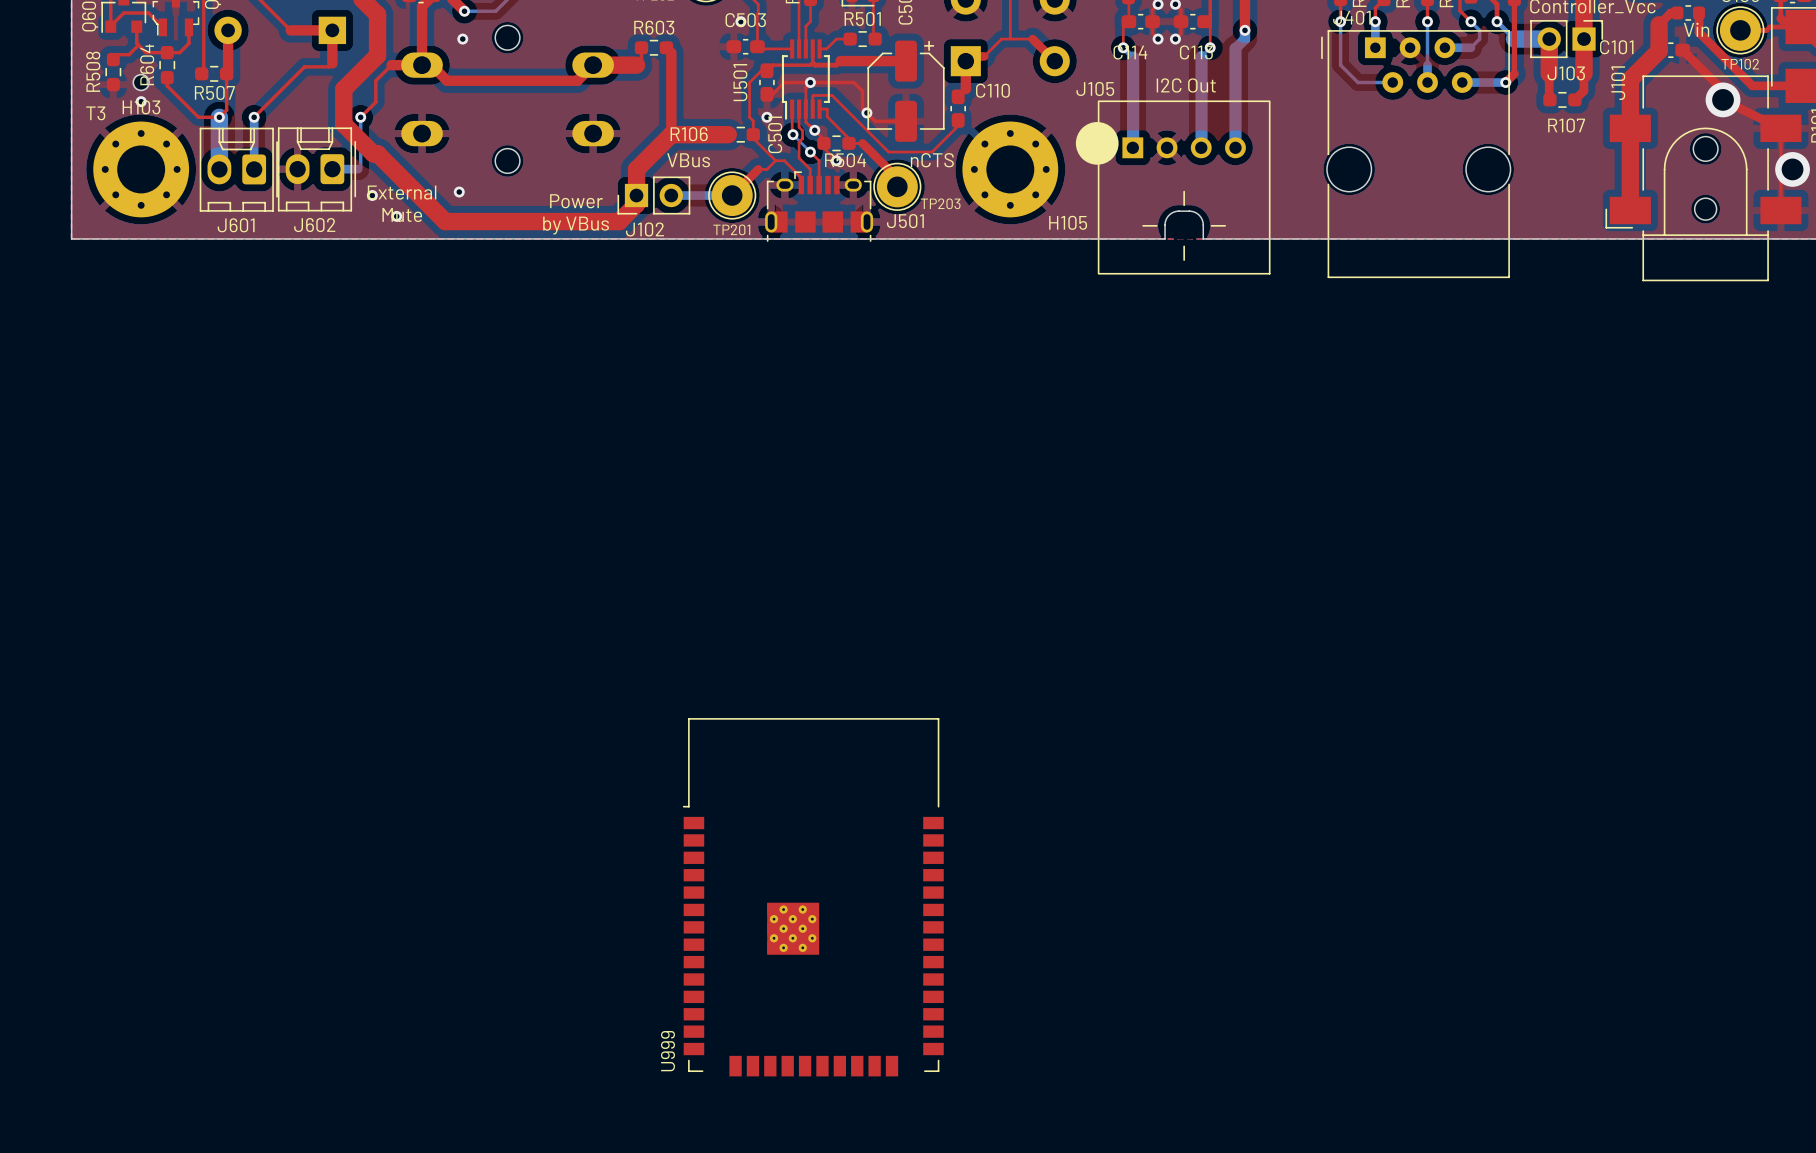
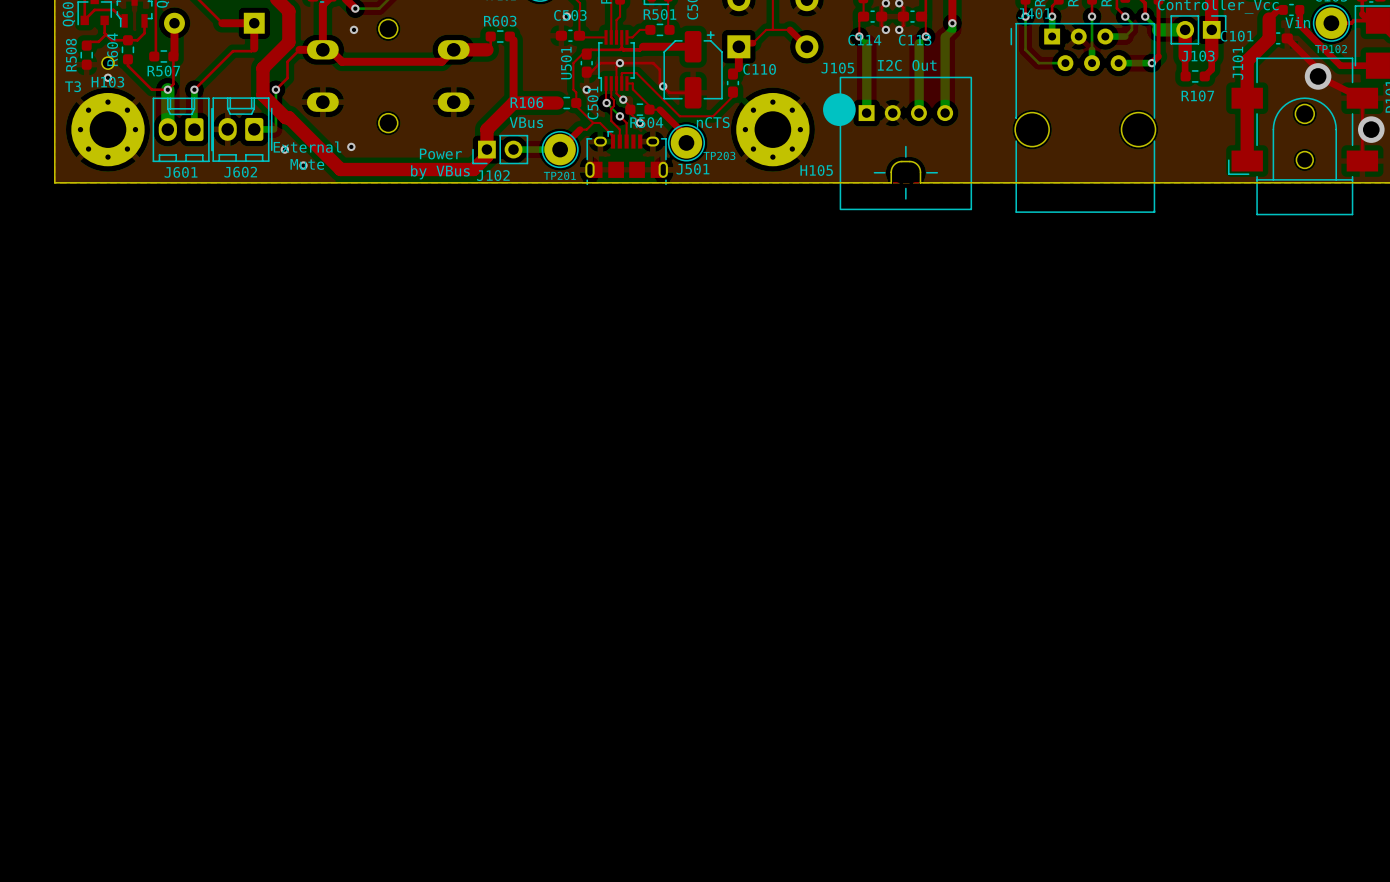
U999: (813, 897) -> none

